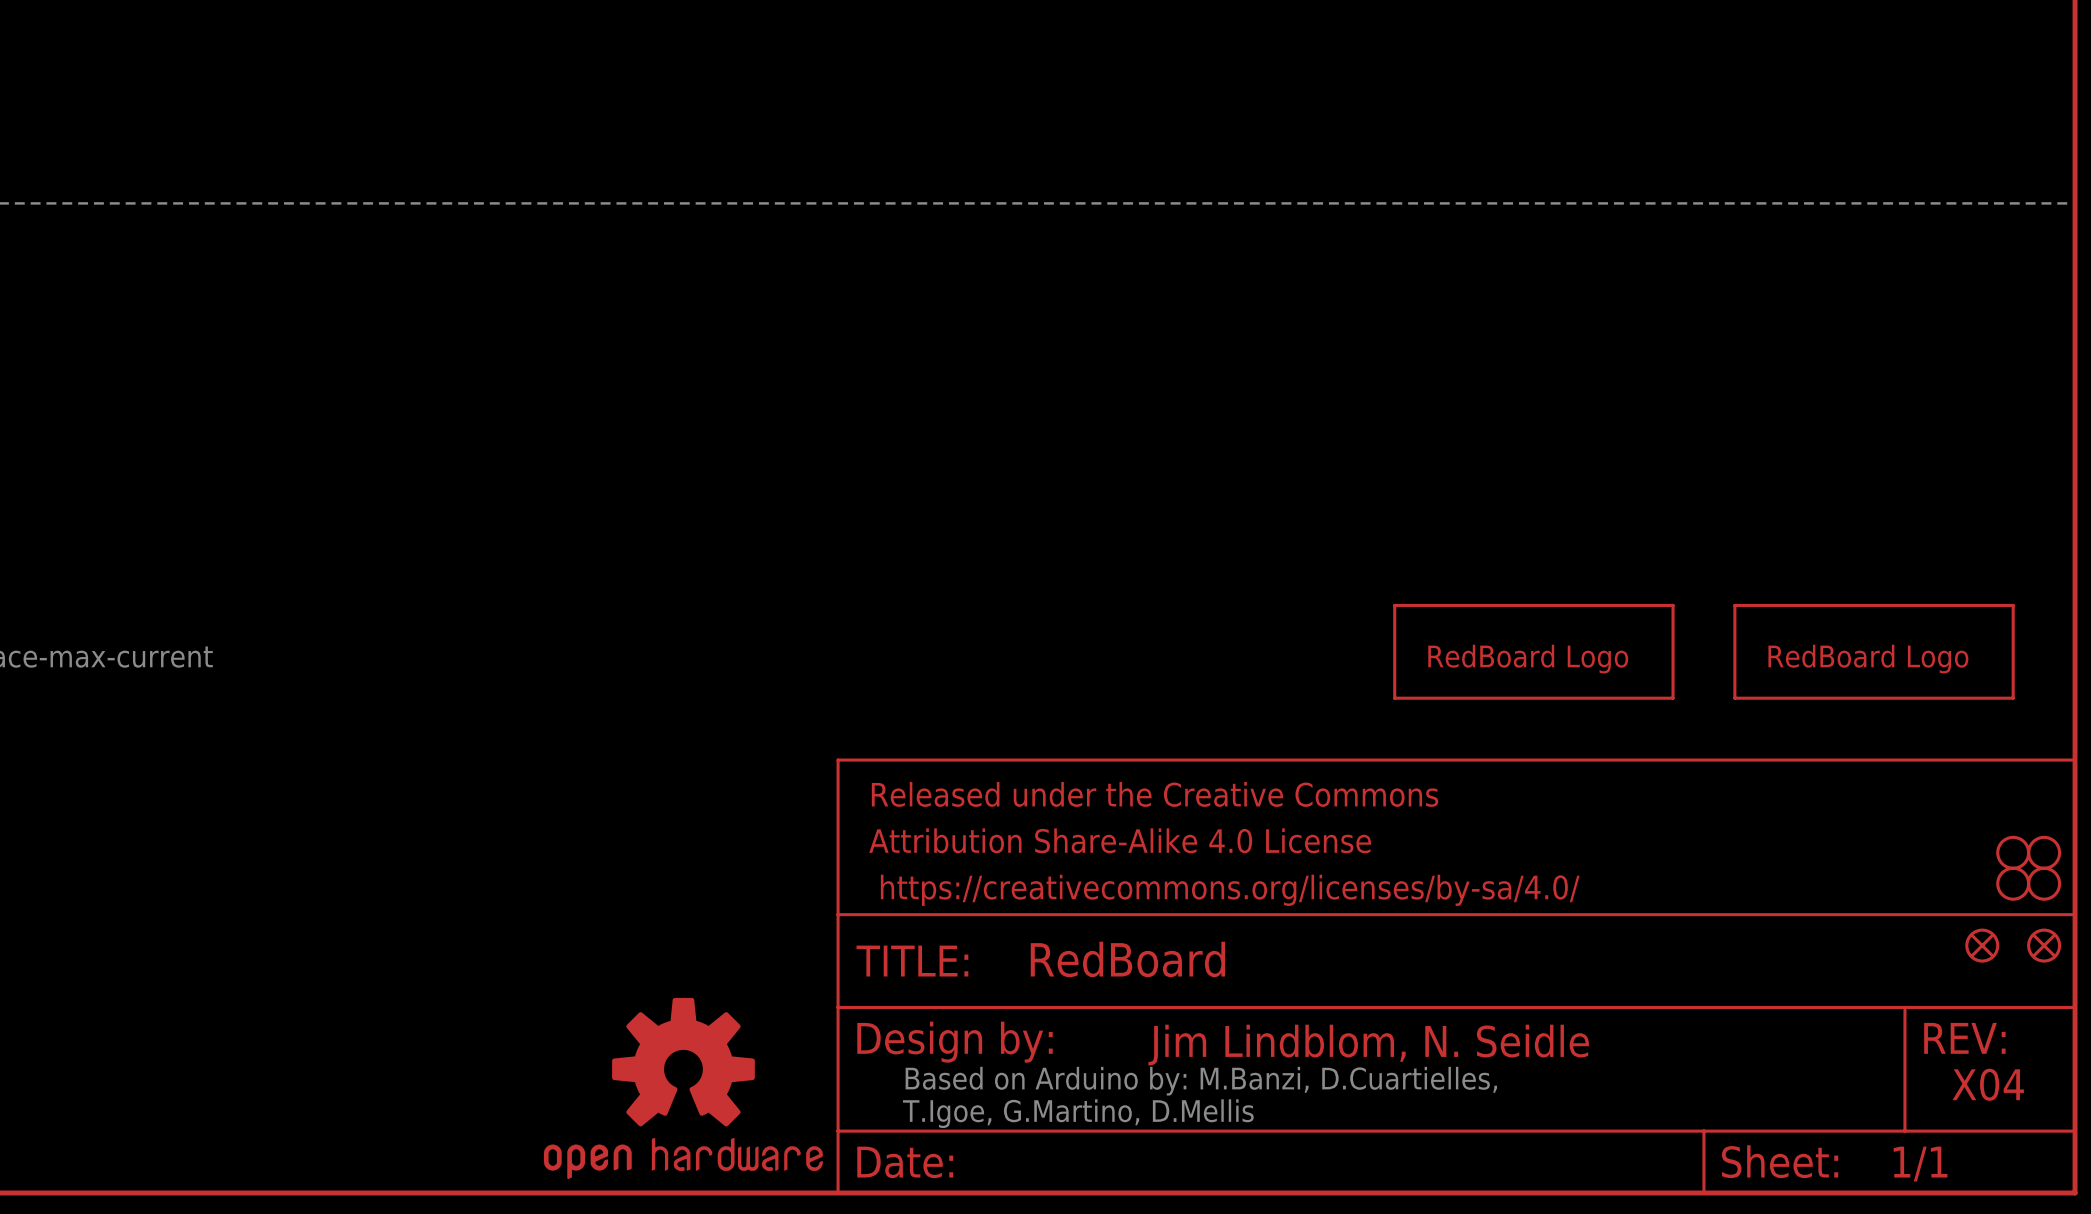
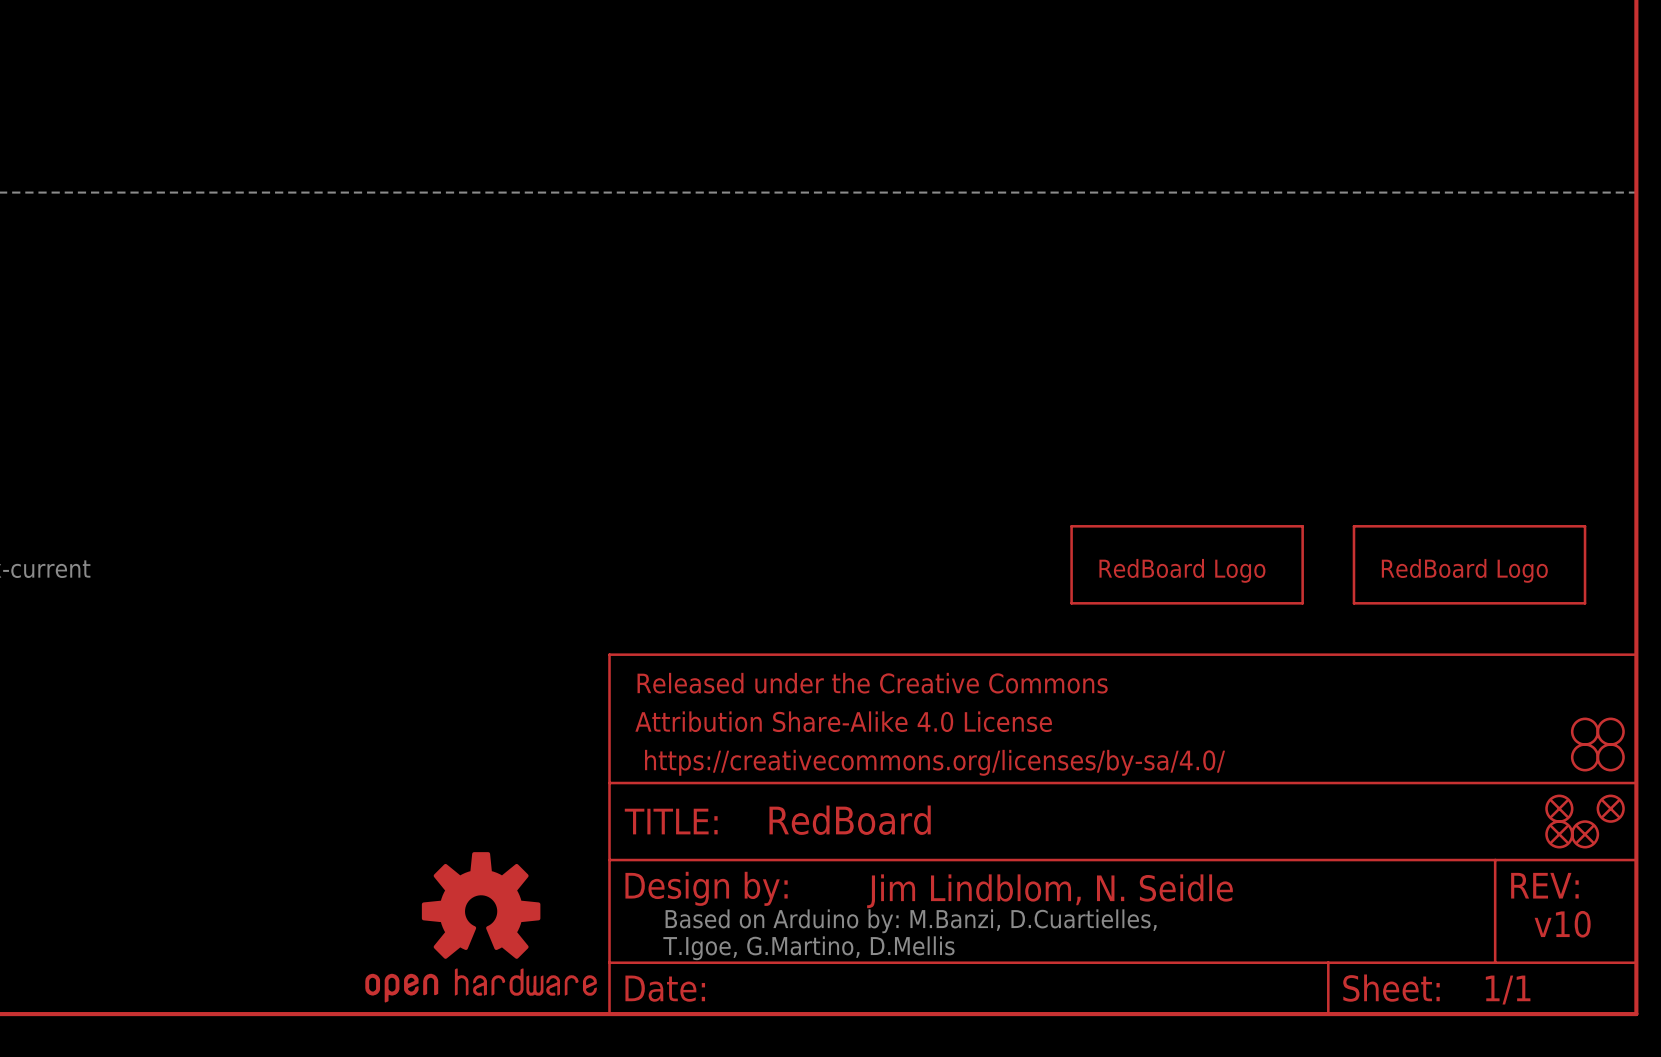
part: none -> (1559, 834)
part: none -> (1585, 834)
text: X04 (1988, 1084) -> v10 (1562, 924)

